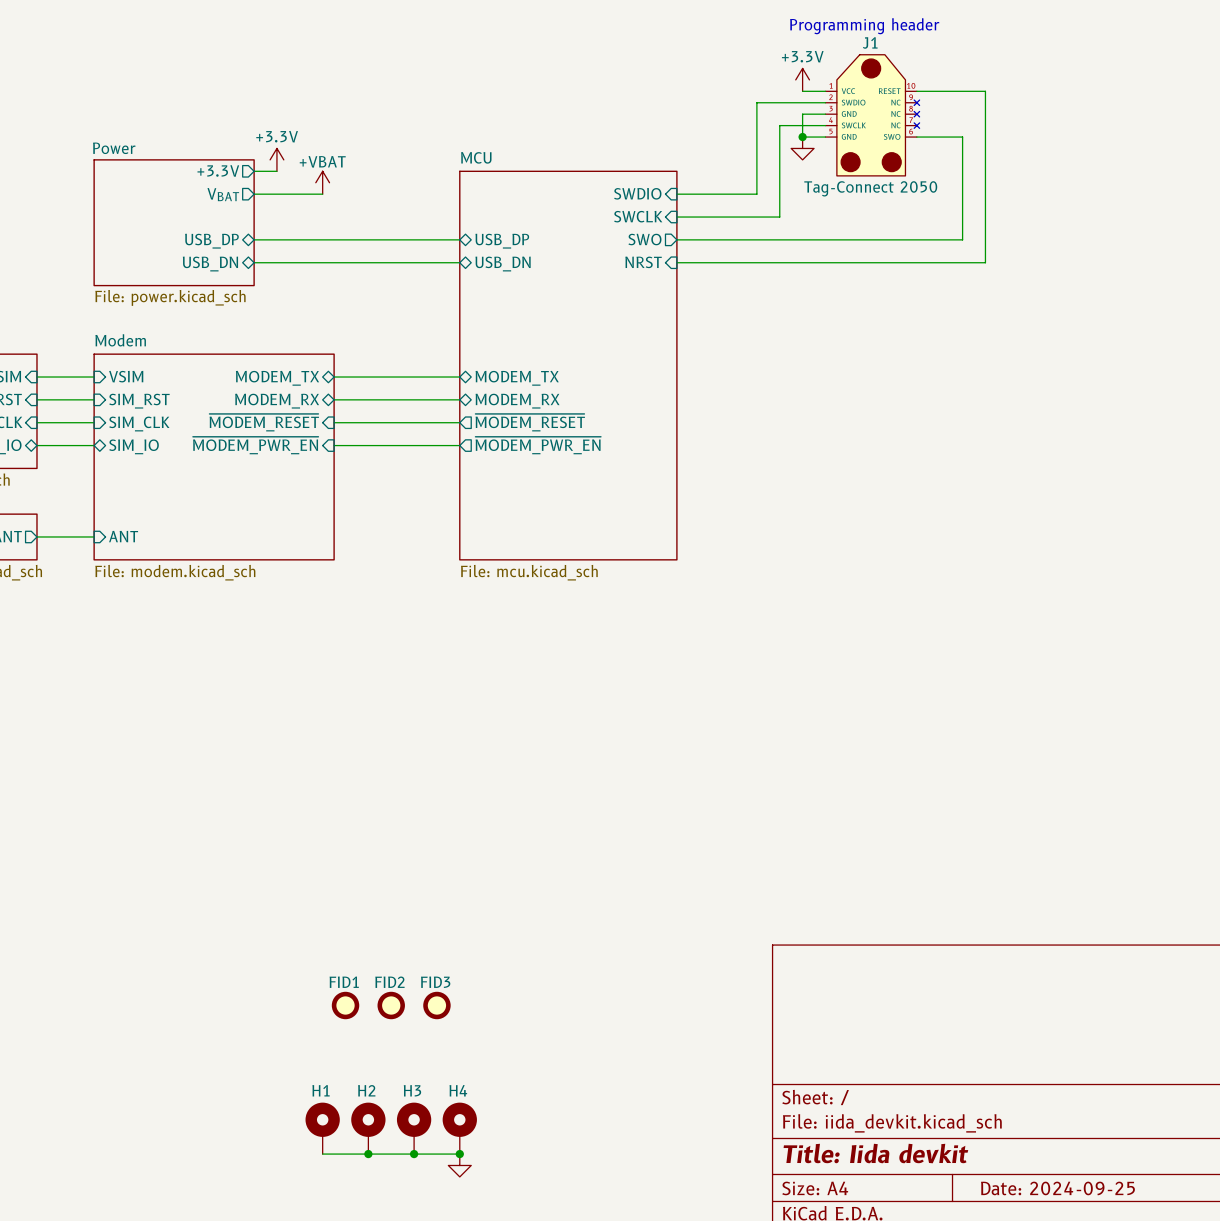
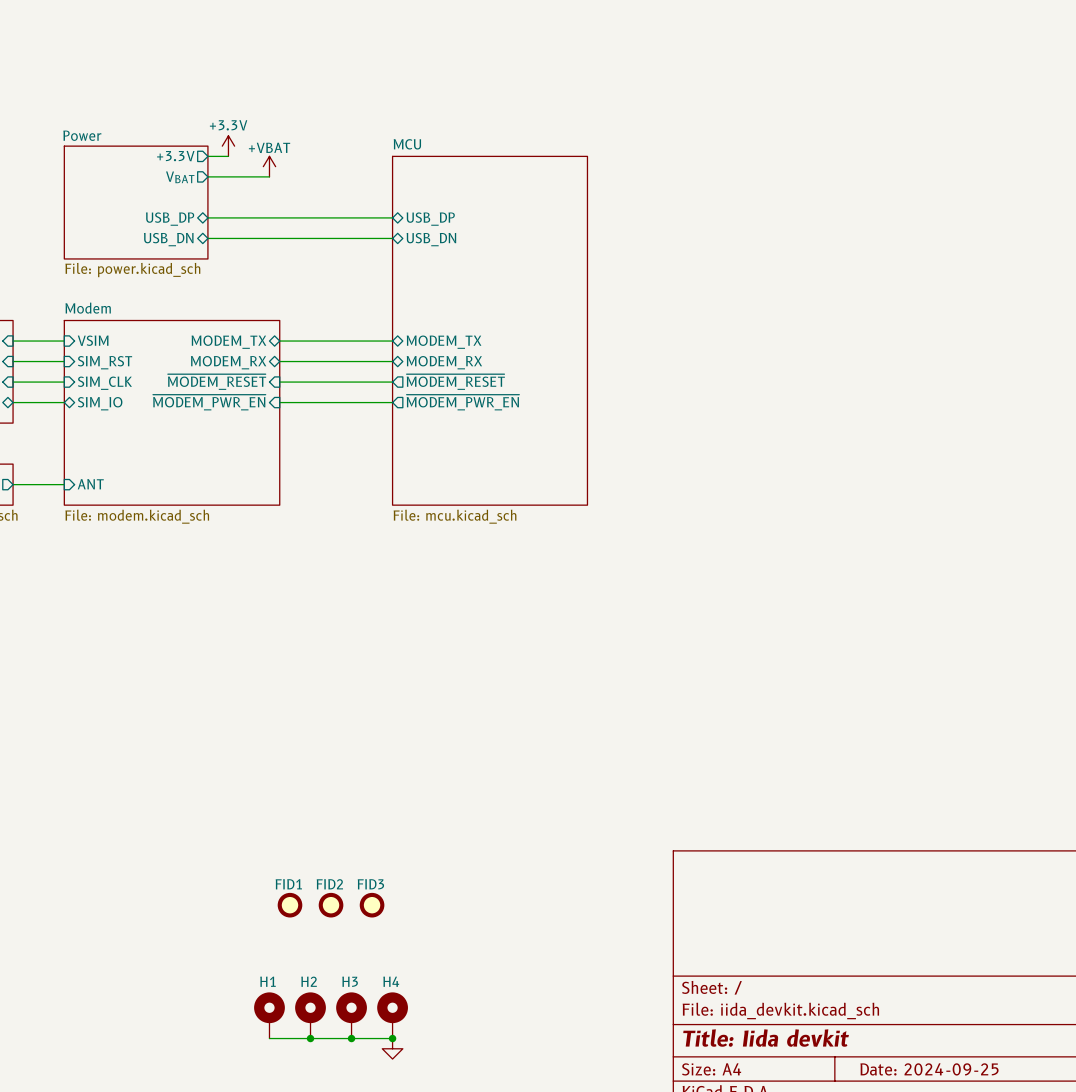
text: Programming header (864, 26) -> none
power symbol: +3.3V (802, 79) -> none
wire: (802, 91) (825, 91) -> none
wire: (916, 91) (985, 91) (985, 262) (676, 262) -> none
wire: (825, 102) (756, 102) (756, 194) (676, 194) -> none
wire: (825, 114) (802, 114) (802, 137) (825, 137) -> none
J1: Tag-Connect 2050 (872, 115) -> none
wire: (825, 125) (779, 125) (779, 217) (676, 217) -> none
junction: (802, 137) -> none
wire: (916, 137) (962, 137) (962, 239) (676, 239) -> none
power symbol: (802, 148) -> none
sheet pin: SWDIO (637, 193) -> none
sheet pin: SWCLK (638, 216) -> none
sheet pin: SWO (644, 239) -> none
sheet pin: NRST (643, 262) -> none

